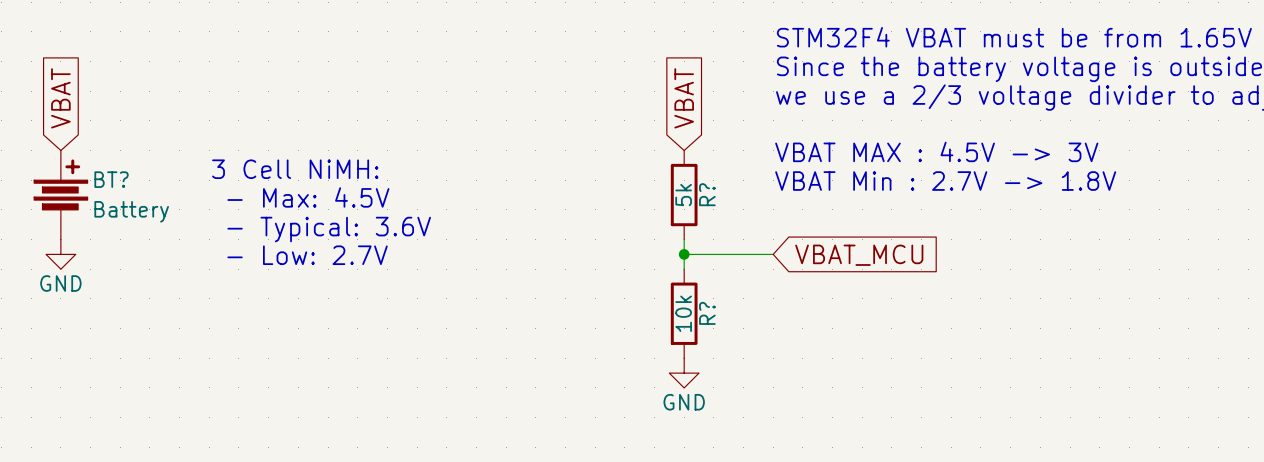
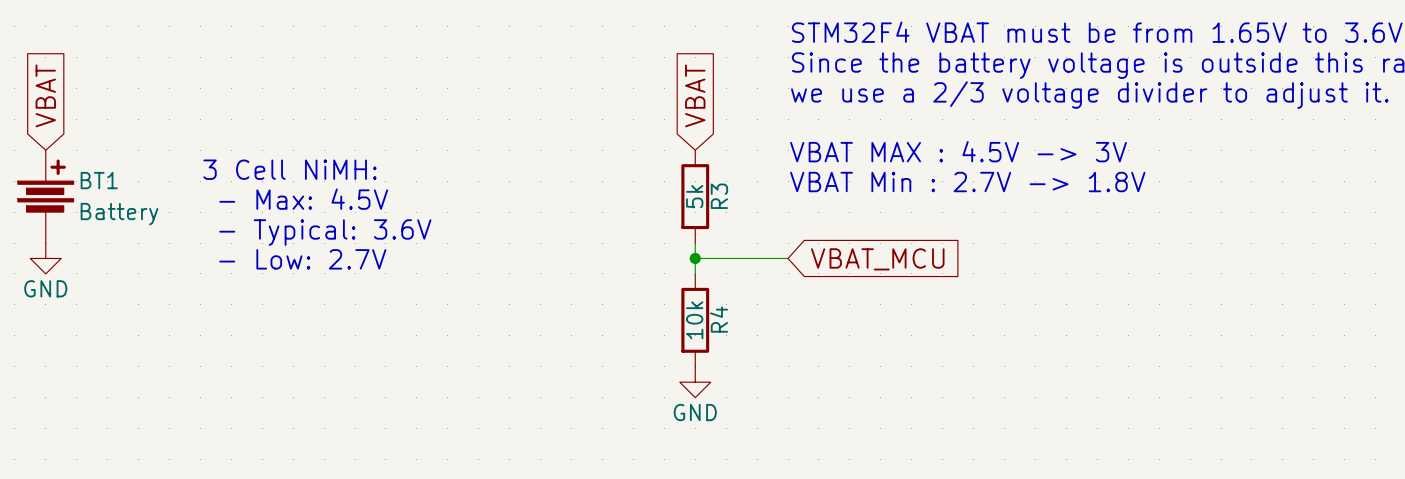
BT? name: BT? (111, 179) -> BT1 (99, 180)
R? name: R? (707, 194) -> R3 (719, 196)
R? name: R? (707, 313) -> R4 (719, 319)

